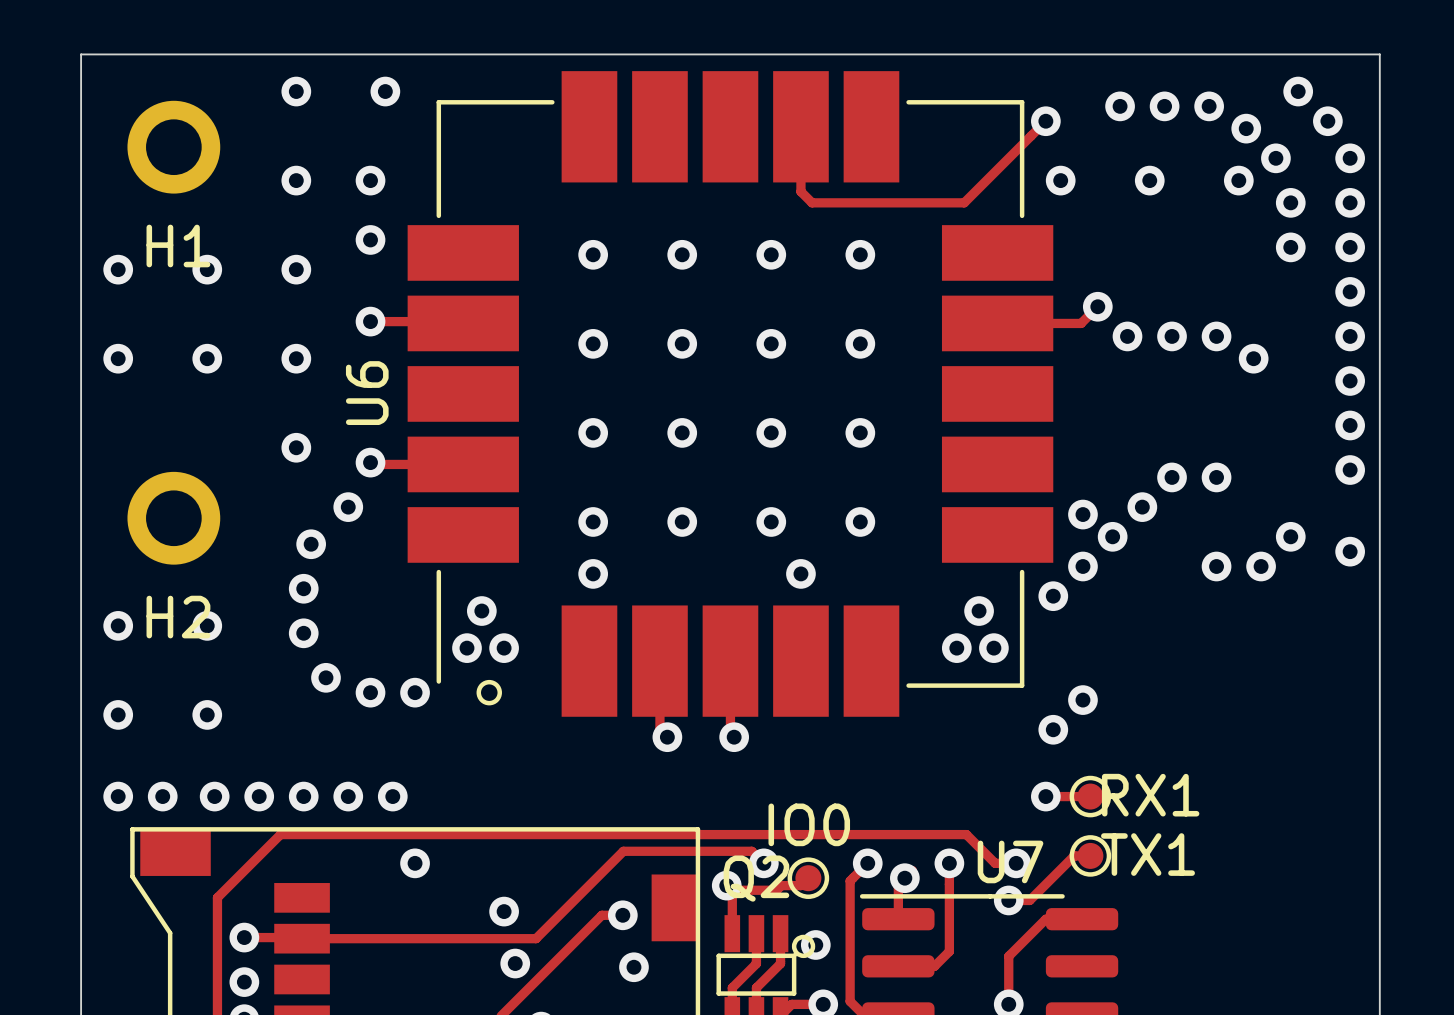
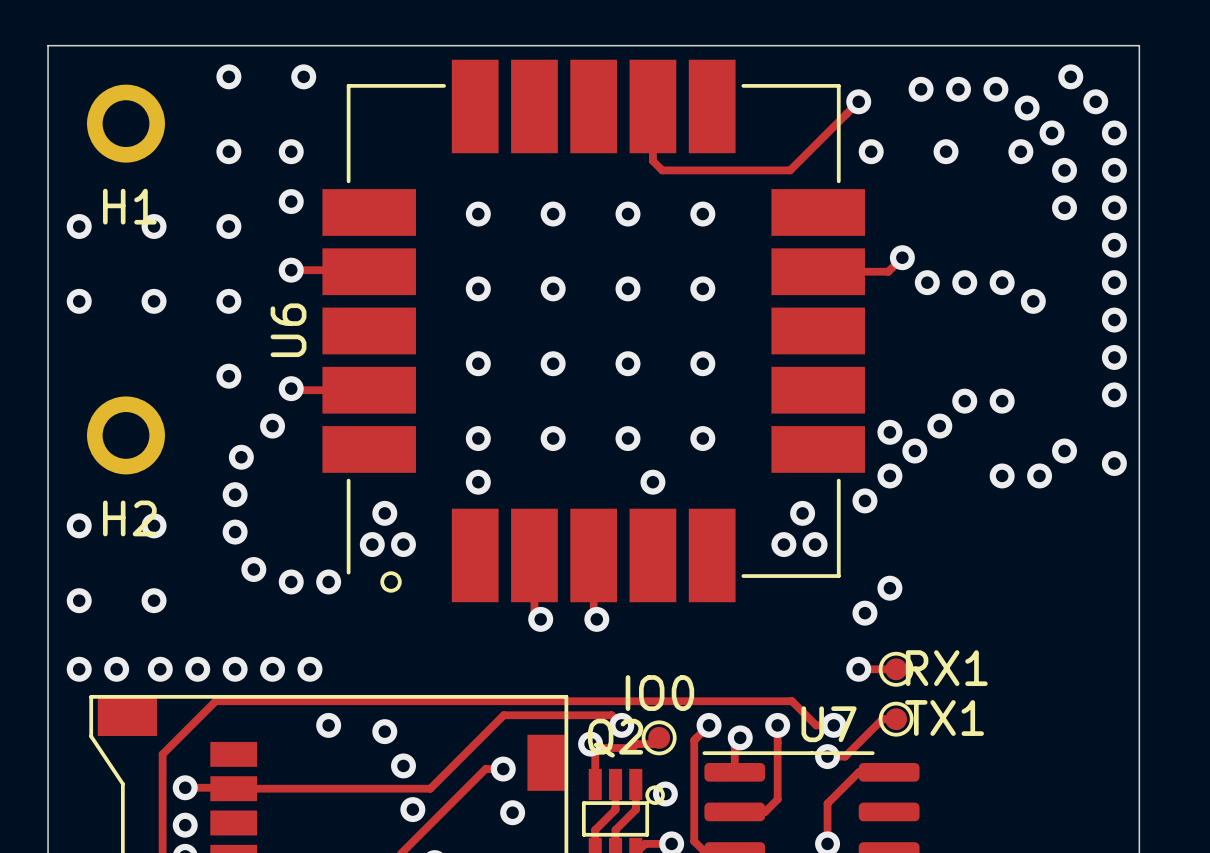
via: none -> (384, 731)

